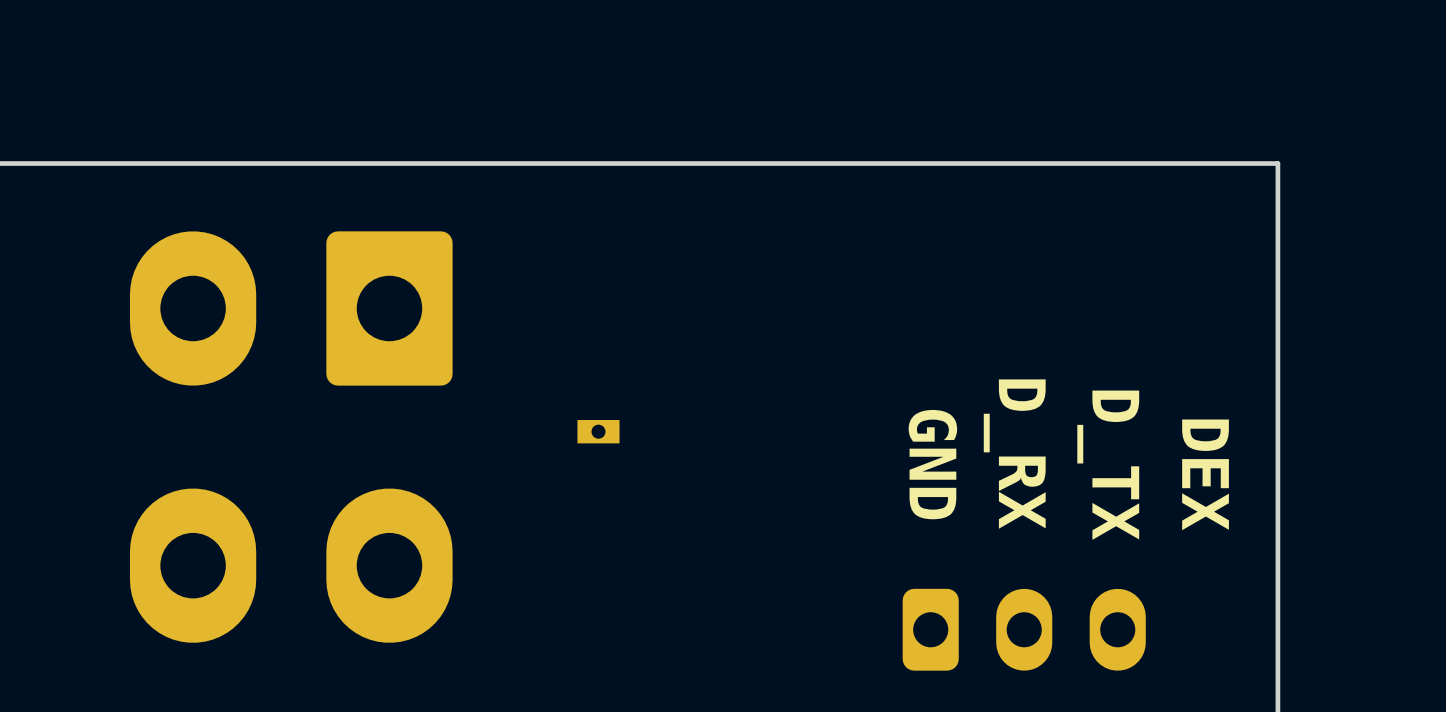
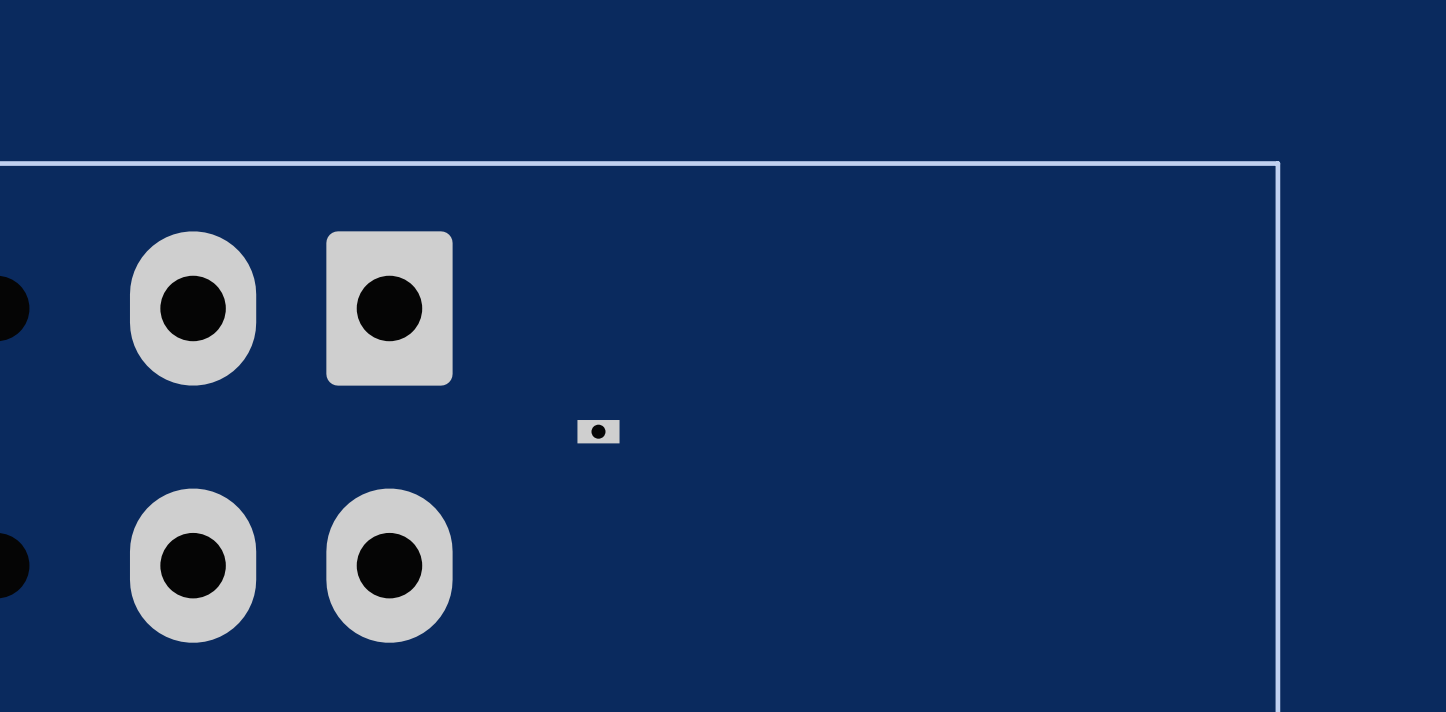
text: D_RX (1014, 454) -> none
text: GND (932, 464) -> none
text: D_TX (1108, 465) -> none
text: DEX (1205, 474) -> none
part: (1024, 629) -> none

